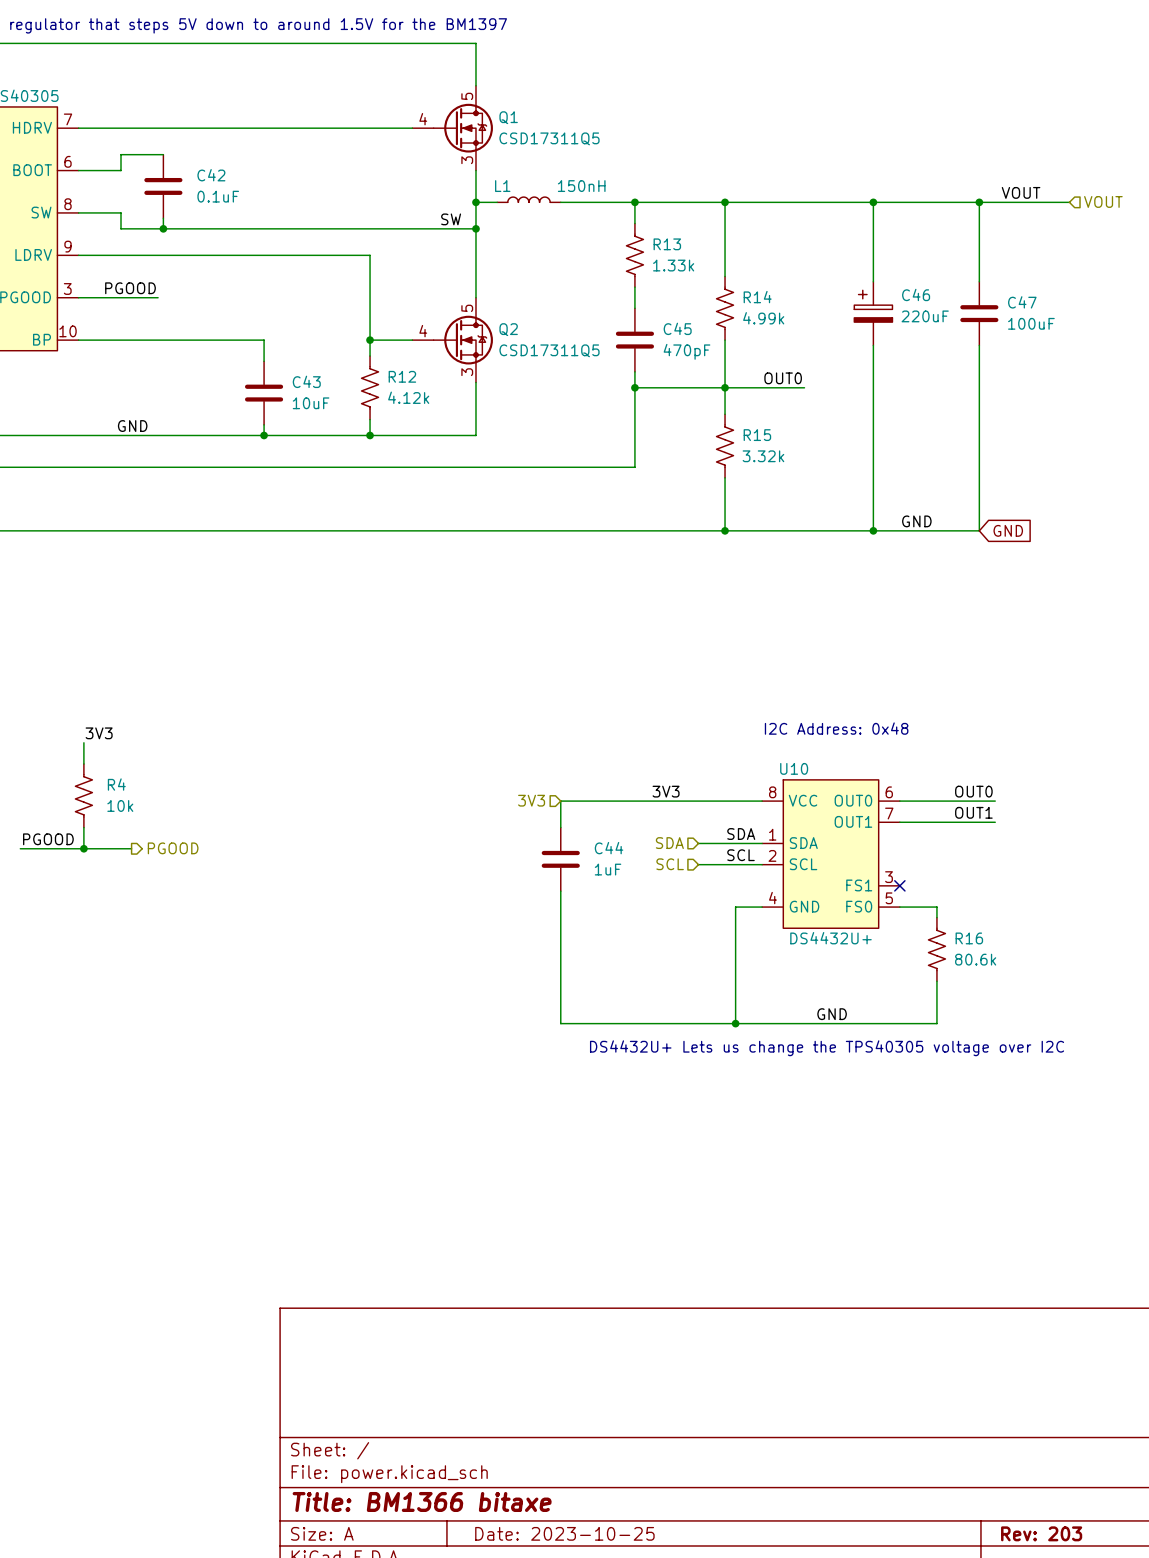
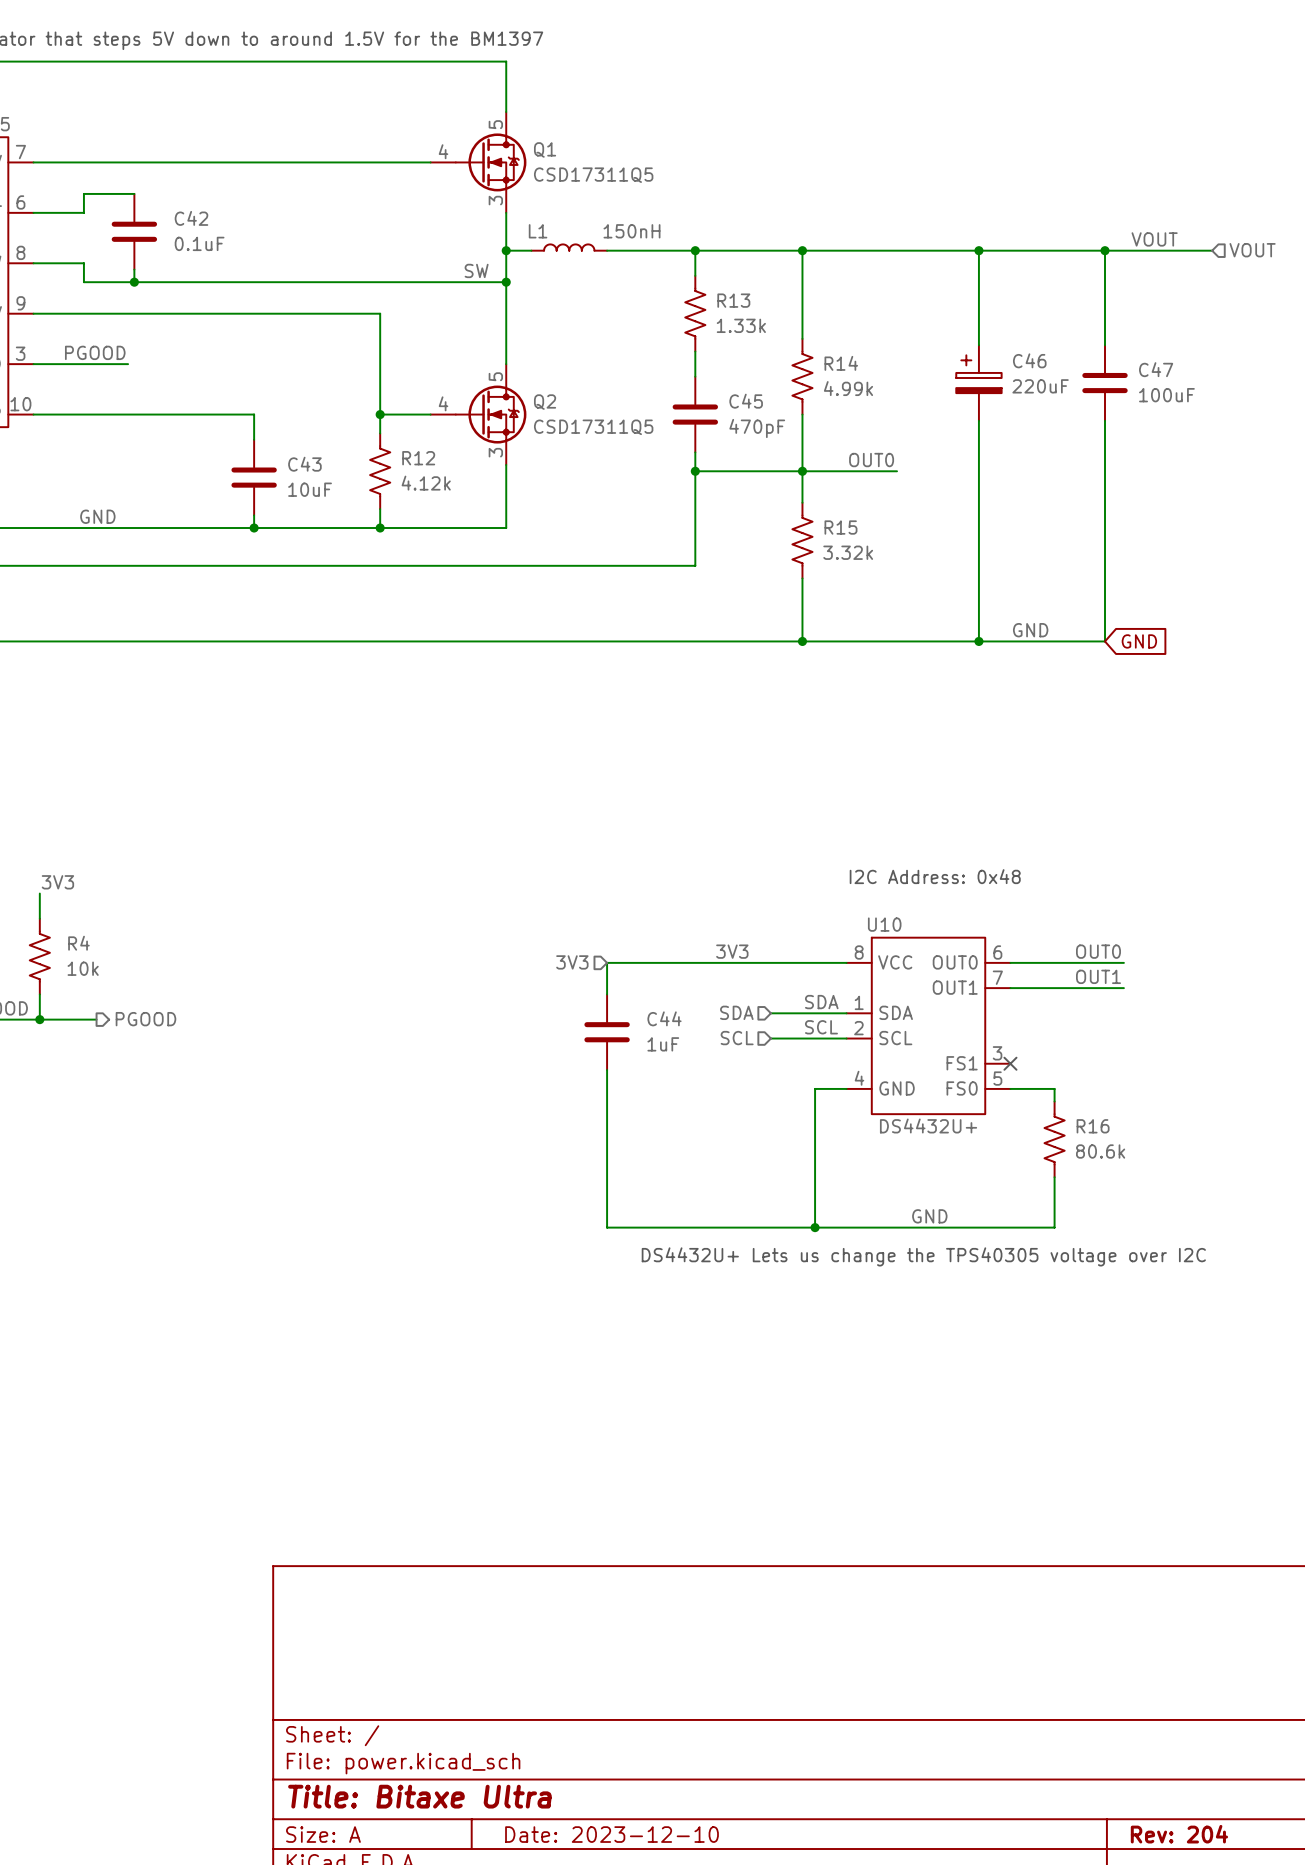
title block: Title: BM1366 bitaxe (422, 1501) -> Title: Bitaxe Ultra (419, 1796)
title block: Date: 2023-10-25 (564, 1533) -> Date: 2023-12-10 (612, 1834)
title block: Rev: 203 (1041, 1533) -> Rev: 204 (1179, 1834)

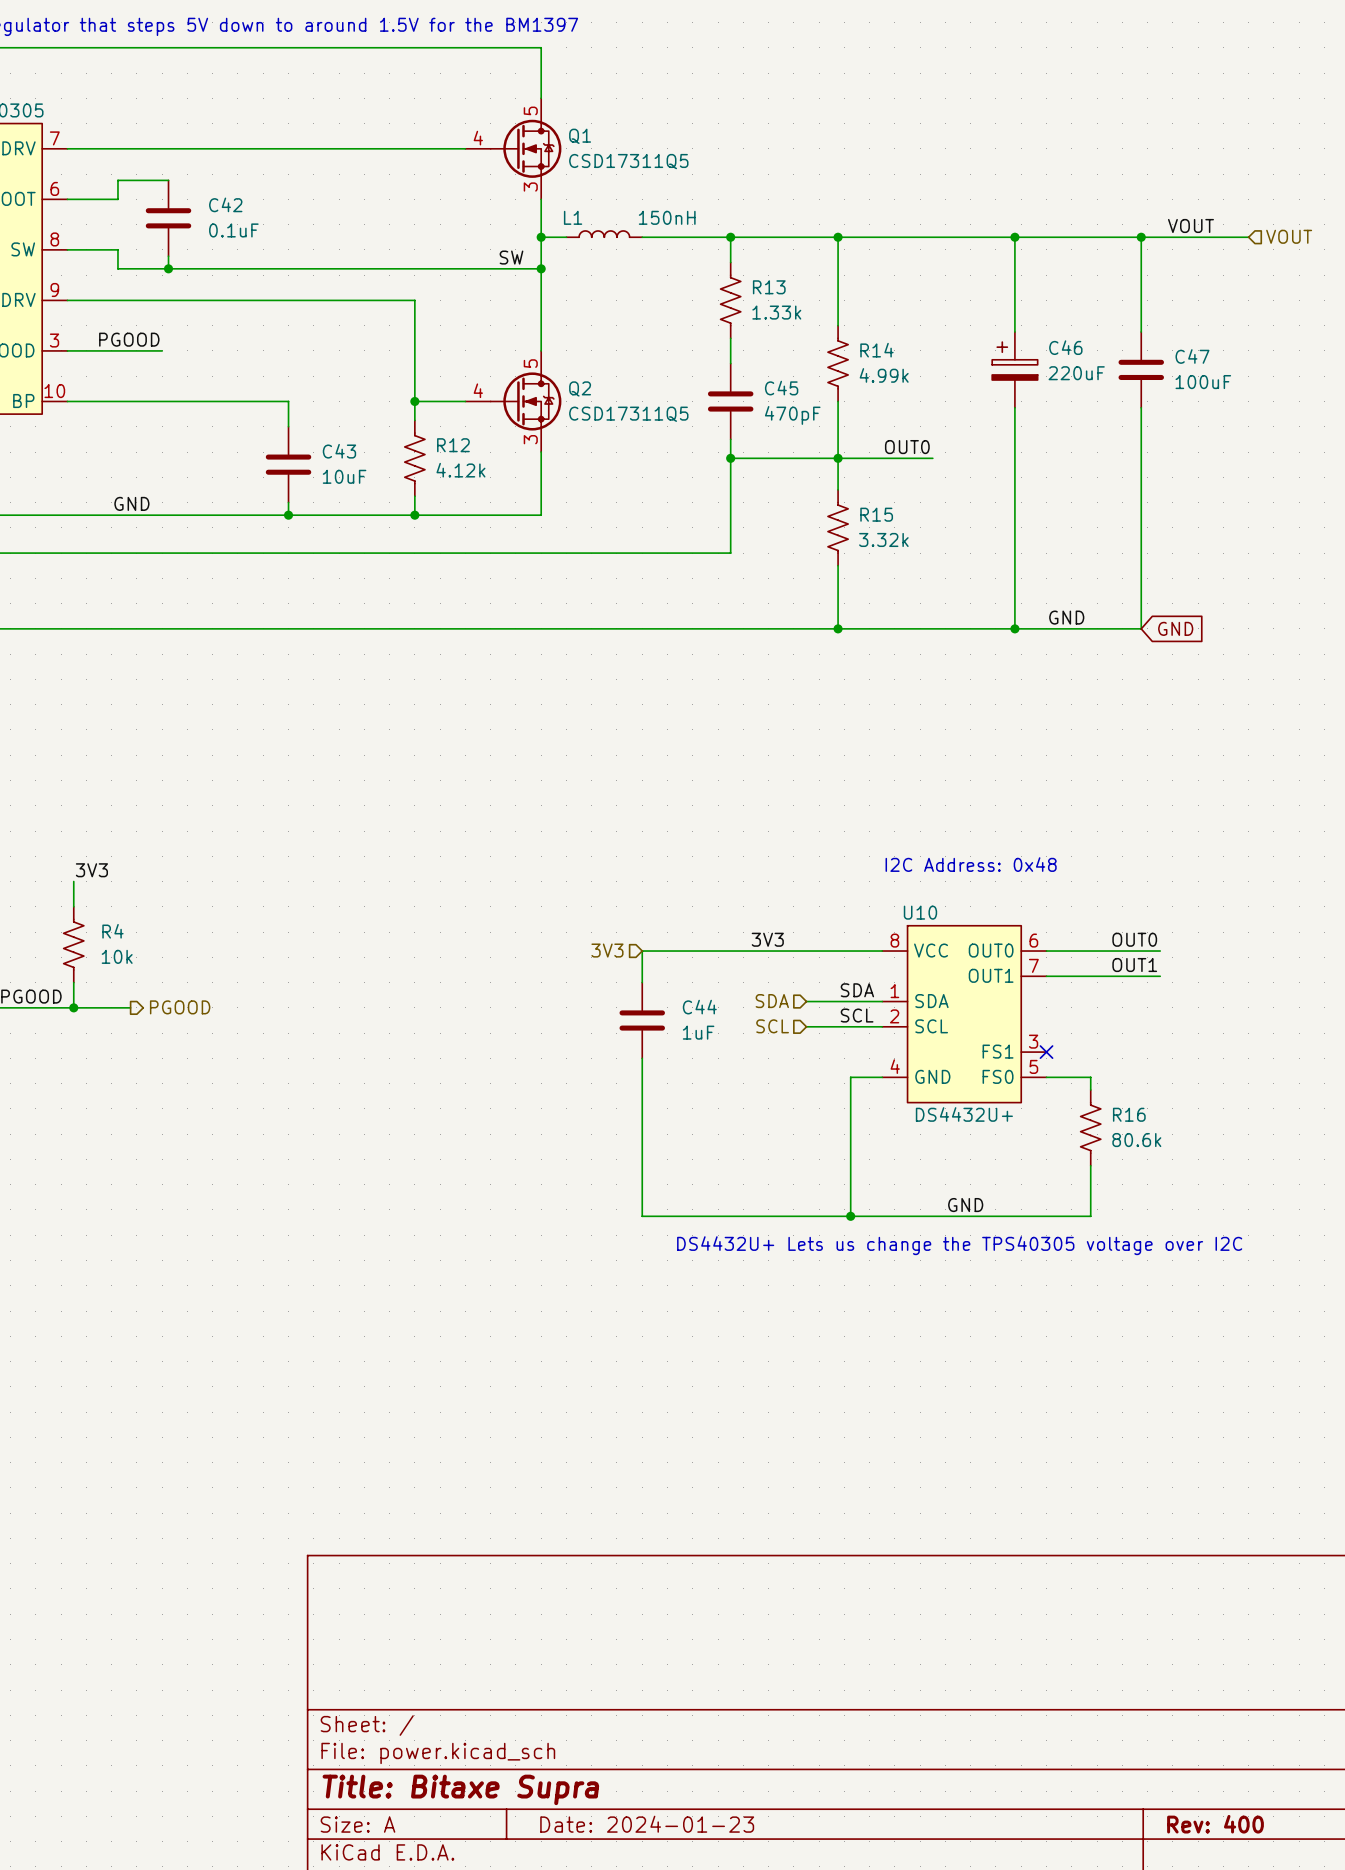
title block: Title: Bitaxe Ultra (419, 1796) -> Title: Bitaxe Supra (460, 1789)
title block: Date: 2023-12-10 (612, 1834) -> Date: 2024-01-23 (647, 1824)
title block: Rev: 204 (1179, 1834) -> Rev: 400 (1215, 1824)

